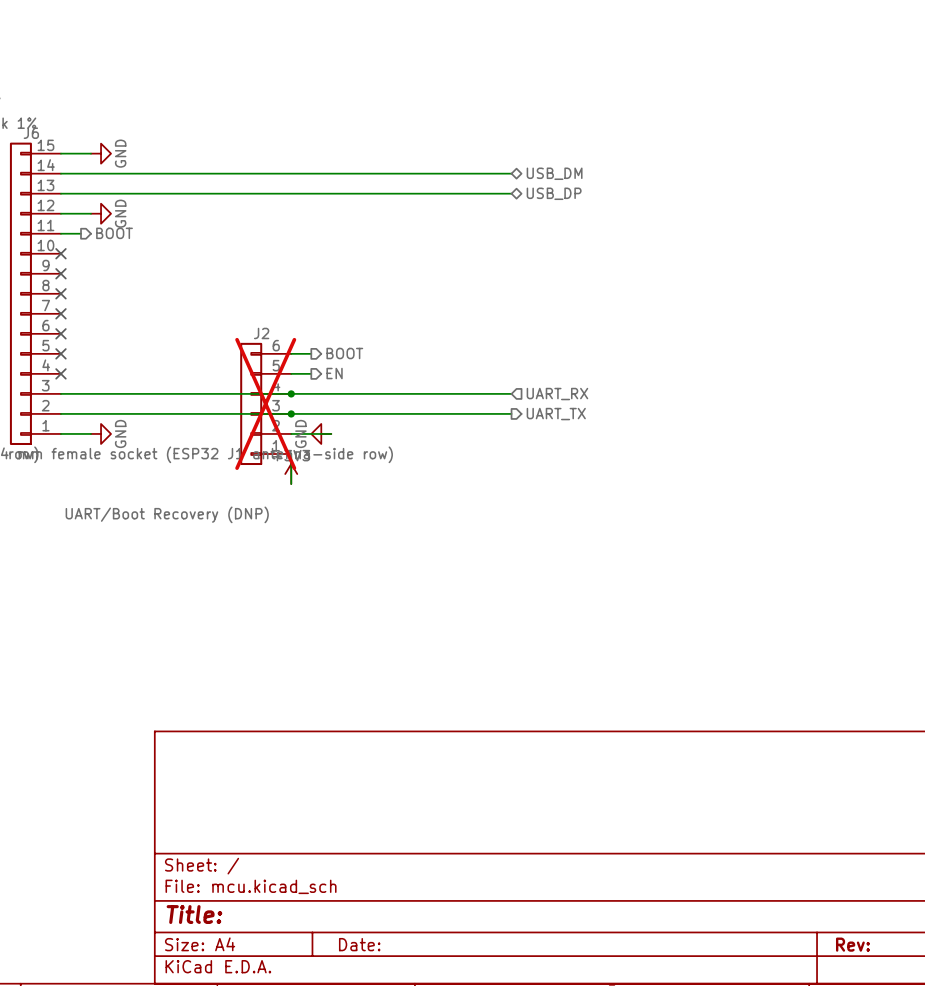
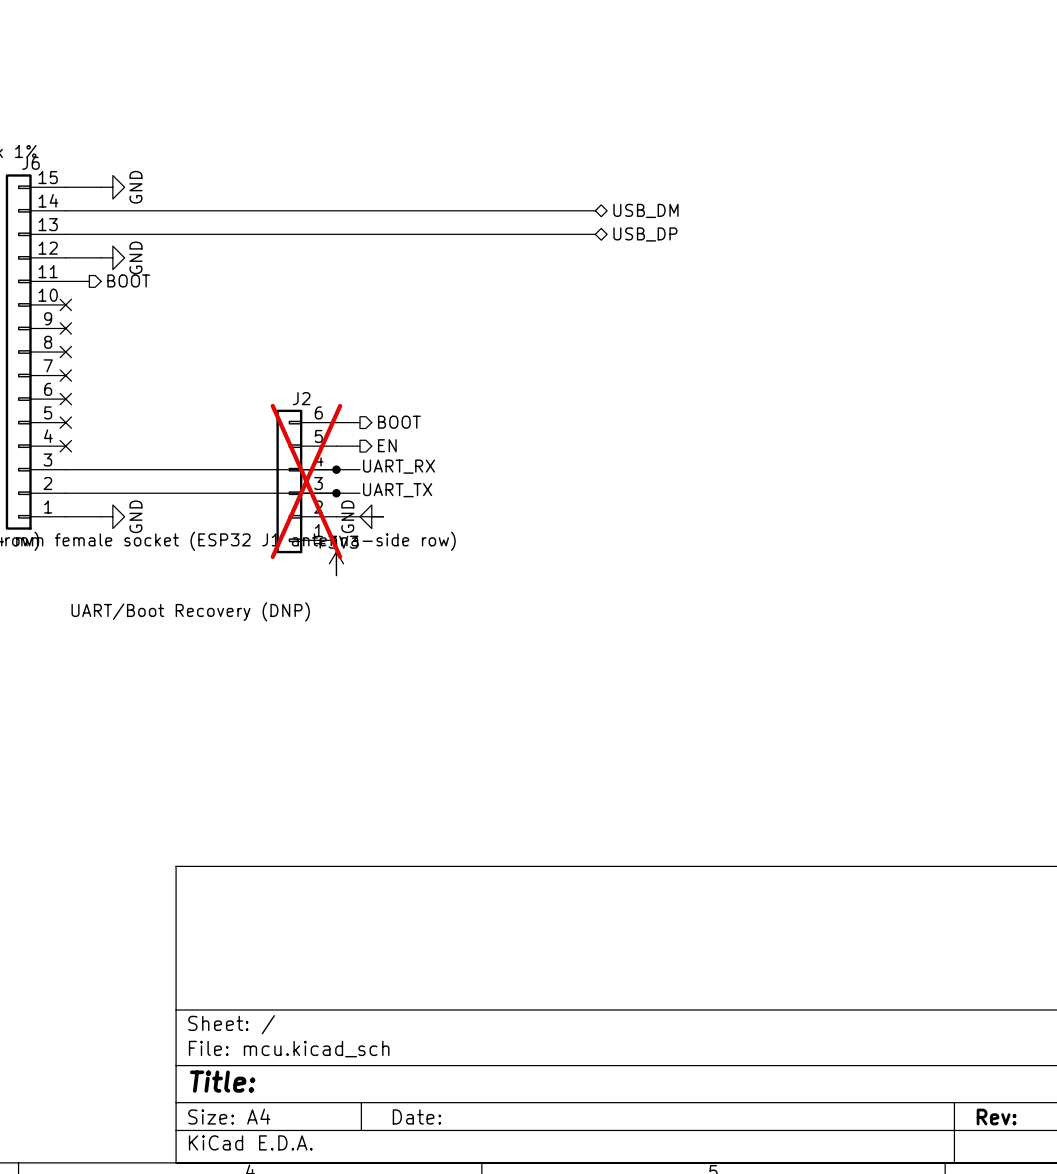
label: none -> UART_RX (399, 466)
wire: (311, 393) (511, 393) -> none
hierarchical label: UART_RX (557, 394) -> none
label: none -> UART_TX (397, 490)
wire: (311, 413) (511, 413) -> none
hierarchical label: UART_TX (556, 414) -> none

